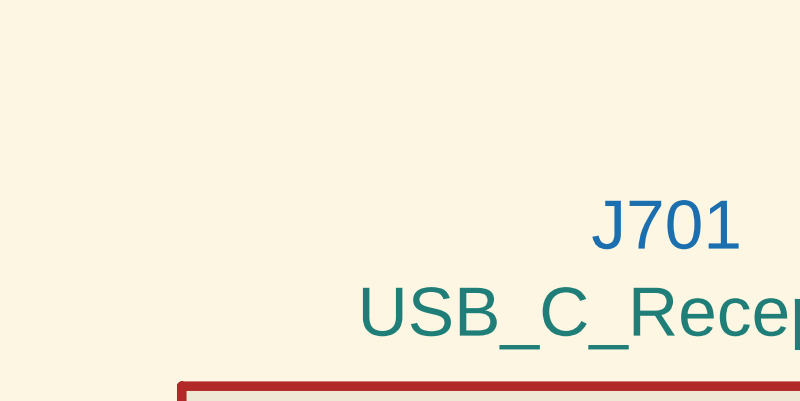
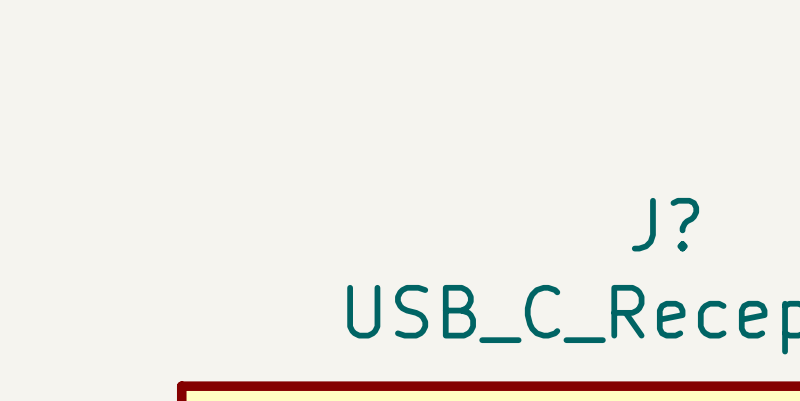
J701 name: J701 (665, 224) -> J? (665, 224)

